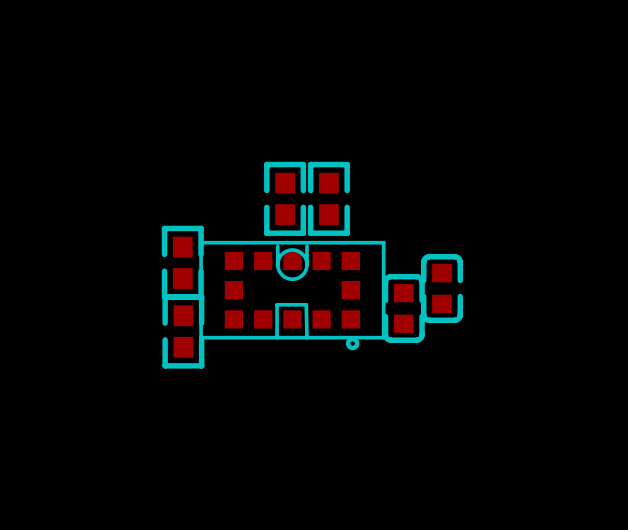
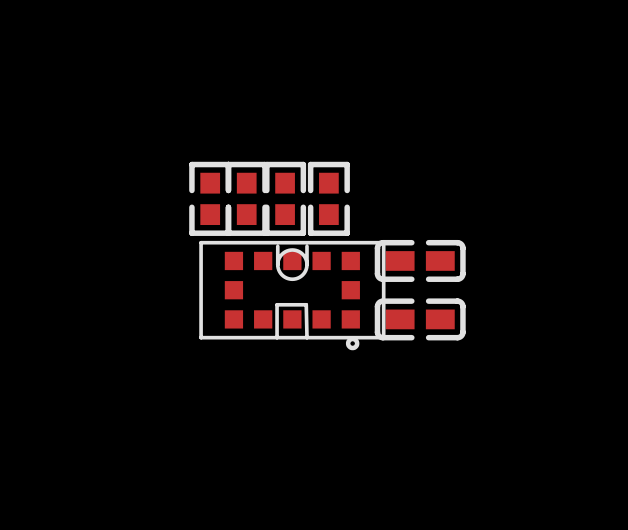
part: none -> (210, 198)
part: none -> (246, 198)
part: none -> (420, 260)
part: (182, 262) -> none
part: (441, 288) -> none
part: (403, 308) -> none
part: none -> (420, 319)
part: (183, 331) -> none

